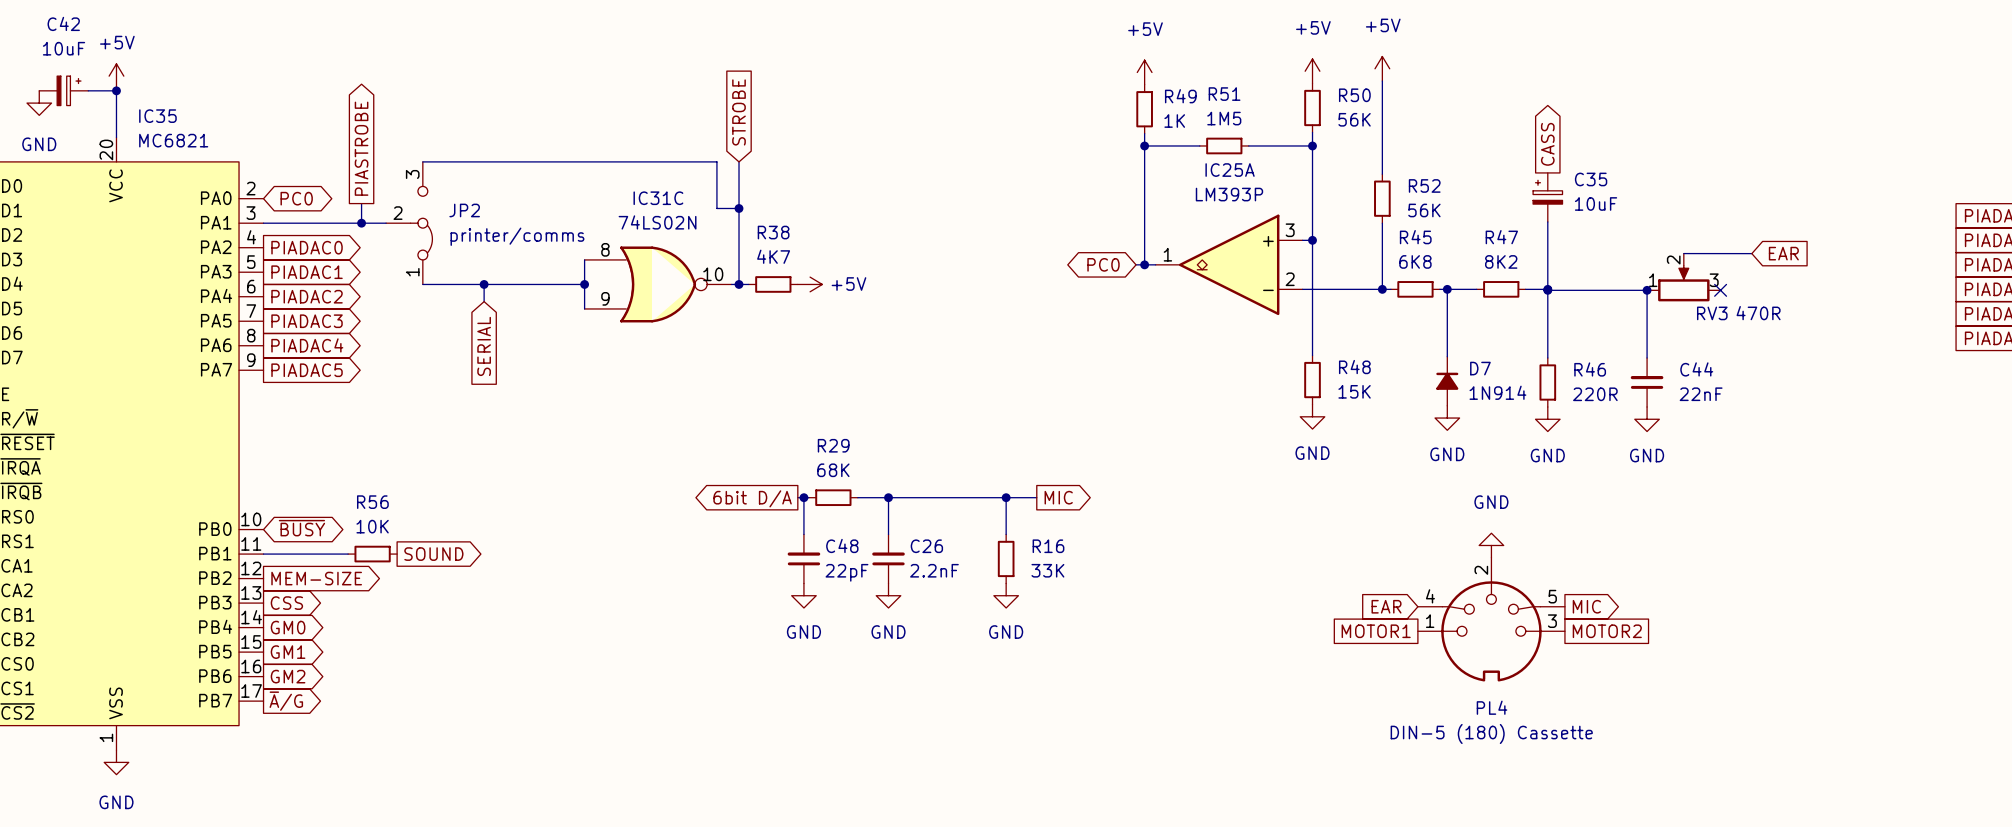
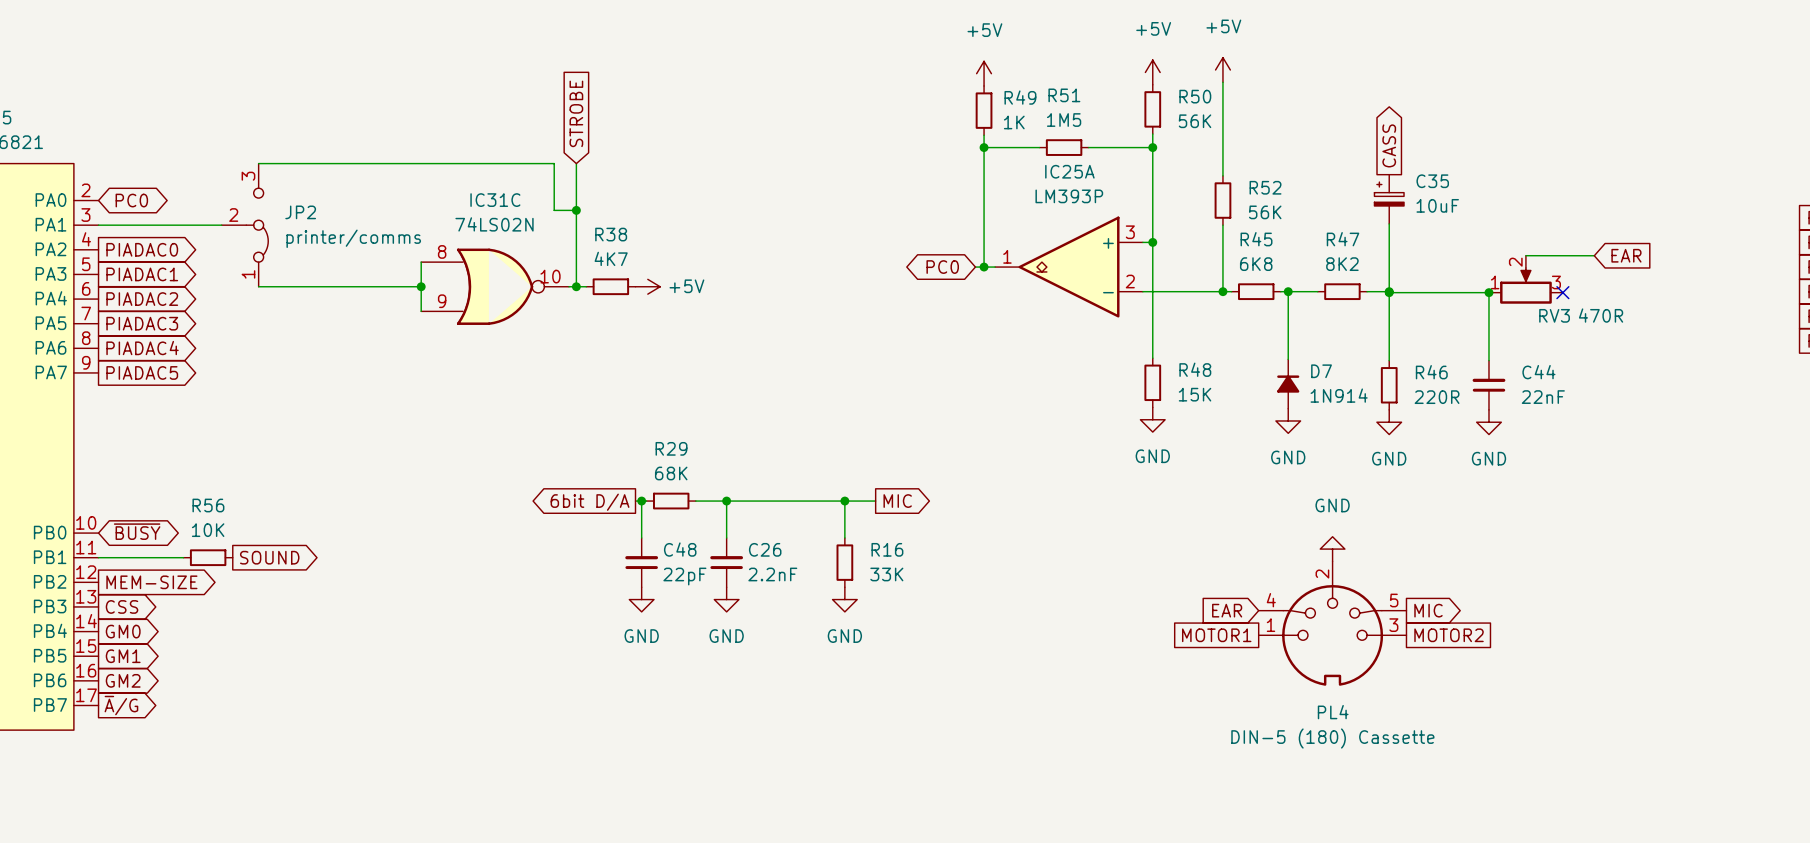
global label: PIASTROBE (361, 148) -> none
wire: (361, 203) (361, 223) -> none
junction: (361, 223) -> none
wire: (484, 284) (484, 301) -> none
junction: (484, 284) -> none
global label: SERIAL (484, 346) -> none

